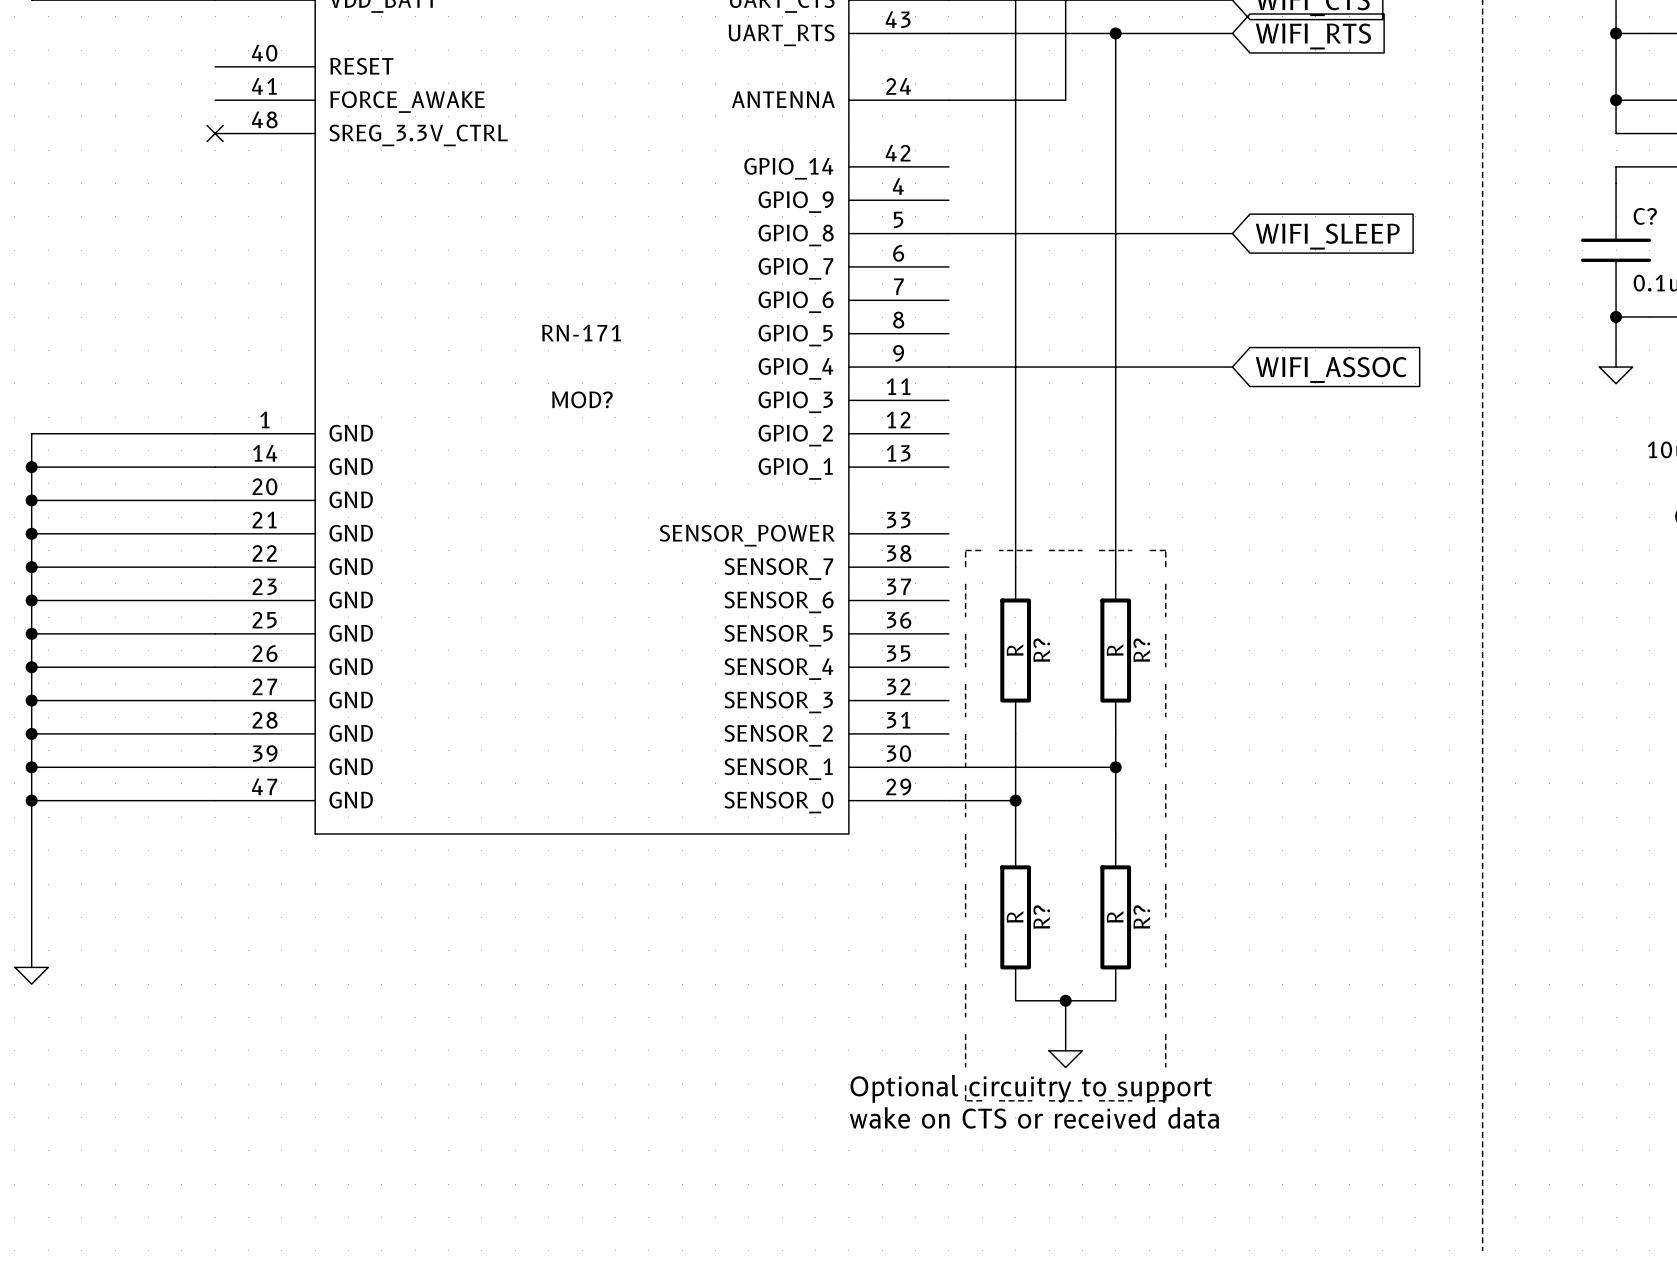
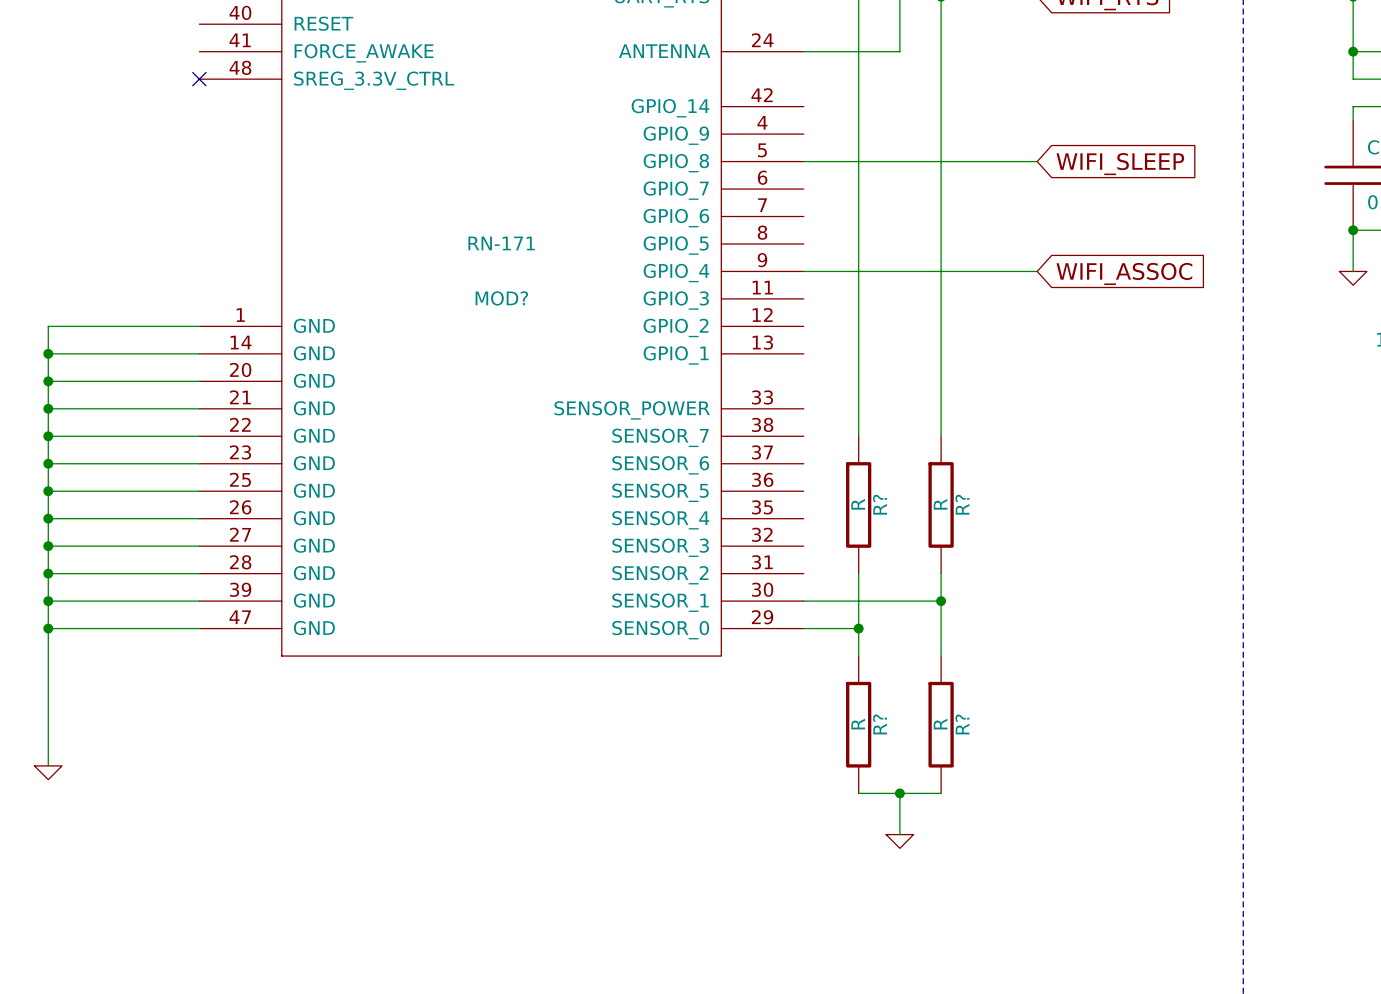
line: (982, 550) (965, 550) (965, 567) -> none
line: (998, 550) (1032, 550) -> none
line: (1049, 550) (1082, 550) -> none
line: (1099, 550) (1132, 550) -> none
line: (1149, 550) (1165, 550) (1165, 567) -> none
line: (965, 583) (965, 617) -> none
line: (1165, 583) (1165, 617) -> none
line: (965, 633) (965, 667) -> none
line: (1165, 633) (1165, 667) -> none
line: (965, 683) (965, 717) -> none
line: (1165, 683) (1165, 717) -> none
line: (965, 733) (965, 767) -> none
line: (1165, 733) (1165, 767) -> none
line: (965, 783) (965, 817) -> none
line: (1165, 783) (1165, 817) -> none
line: (965, 834) (965, 867) -> none
line: (1165, 834) (1165, 867) -> none
line: (965, 884) (965, 917) -> none
line: (1165, 884) (1165, 917) -> none
line: (965, 934) (965, 967) -> none
line: (1165, 934) (1165, 967) -> none
line: (965, 984) (965, 1017) -> none
line: (1165, 984) (1165, 1017) -> none
line: (965, 1034) (965, 1067) -> none
line: (1165, 1034) (1165, 1067) -> none
line: (965, 1084) (965, 1100) (982, 1100) -> none
line: (1165, 1084) (1165, 1100) (1149, 1100) -> none
text: Optional circuitry to support (1031, 1088) -> none
line: (998, 1100) (1032, 1100) -> none
line: (1049, 1100) (1082, 1100) -> none
line: (1099, 1100) (1132, 1100) -> none
text: wake on CTS or received data (1034, 1117) -> none

